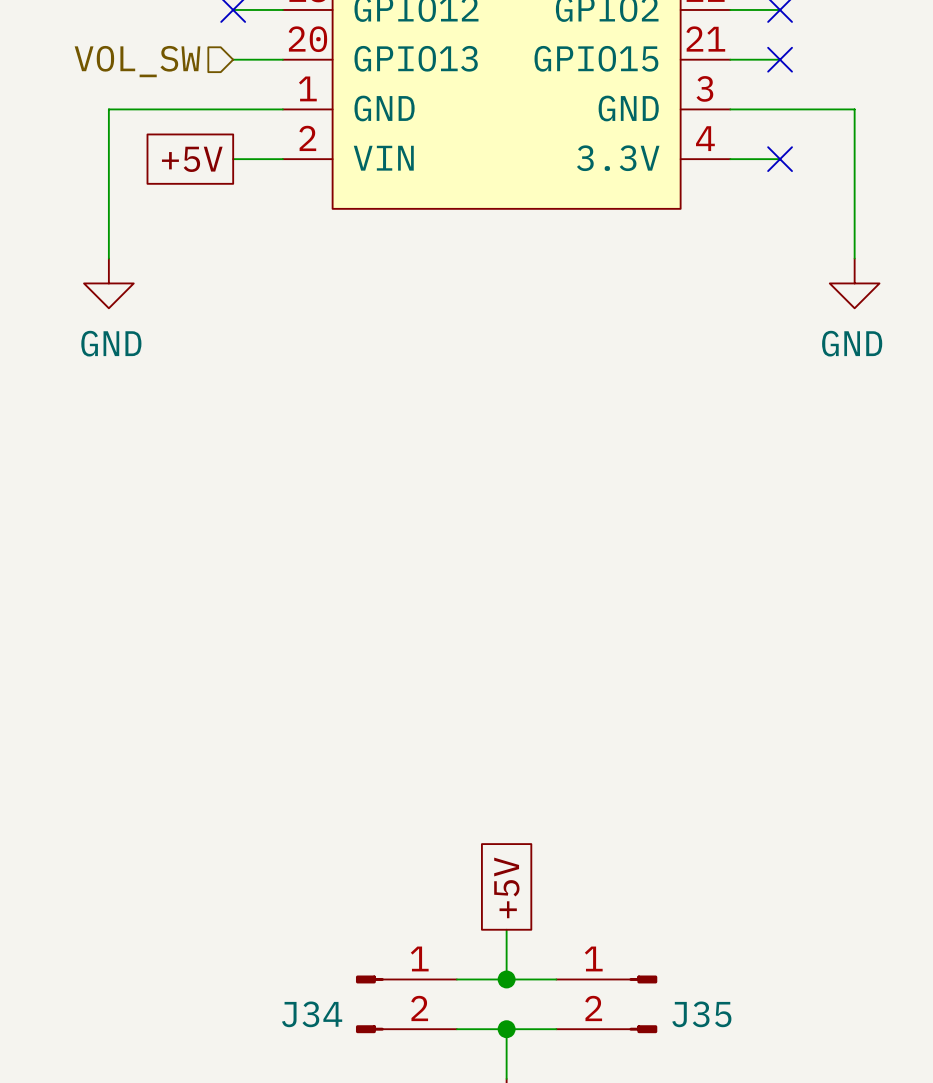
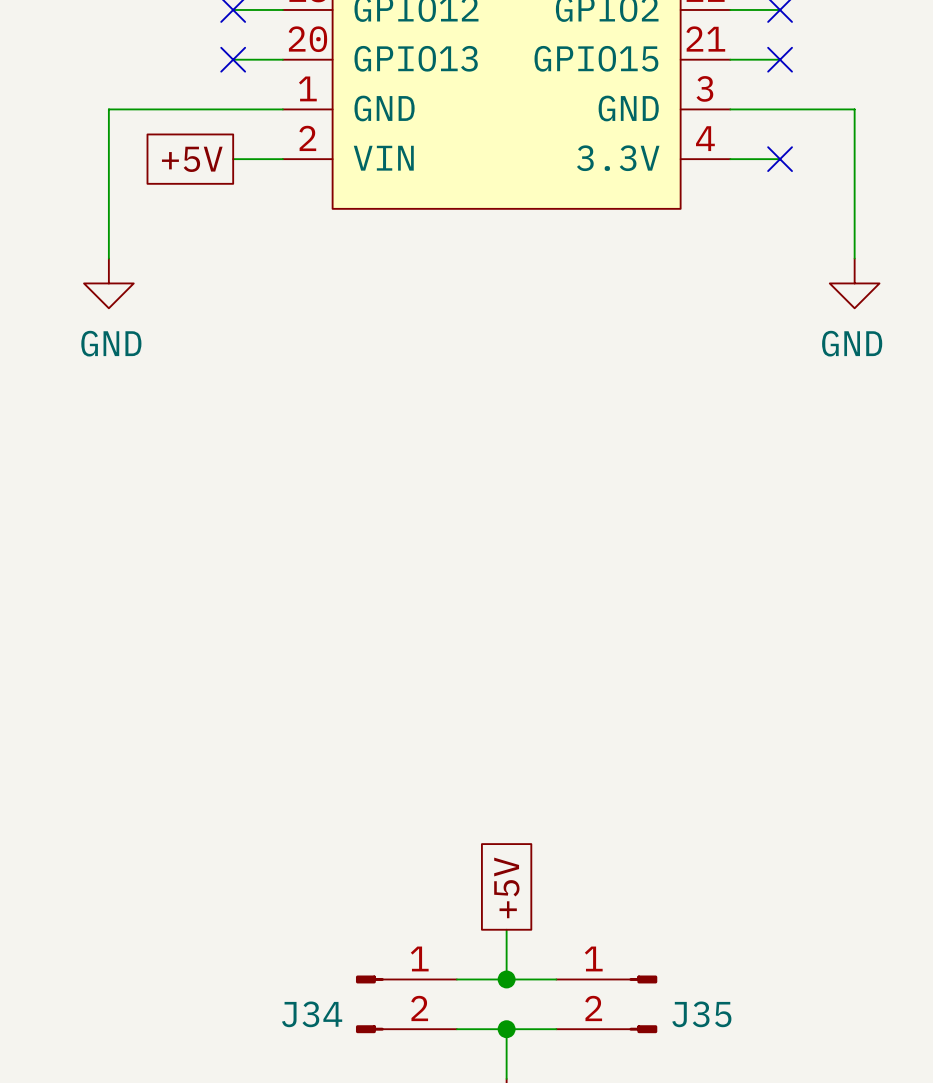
no-connect mark: none -> (233, 59)
hierarchical label: VOL_SW (137, 61) -> none

